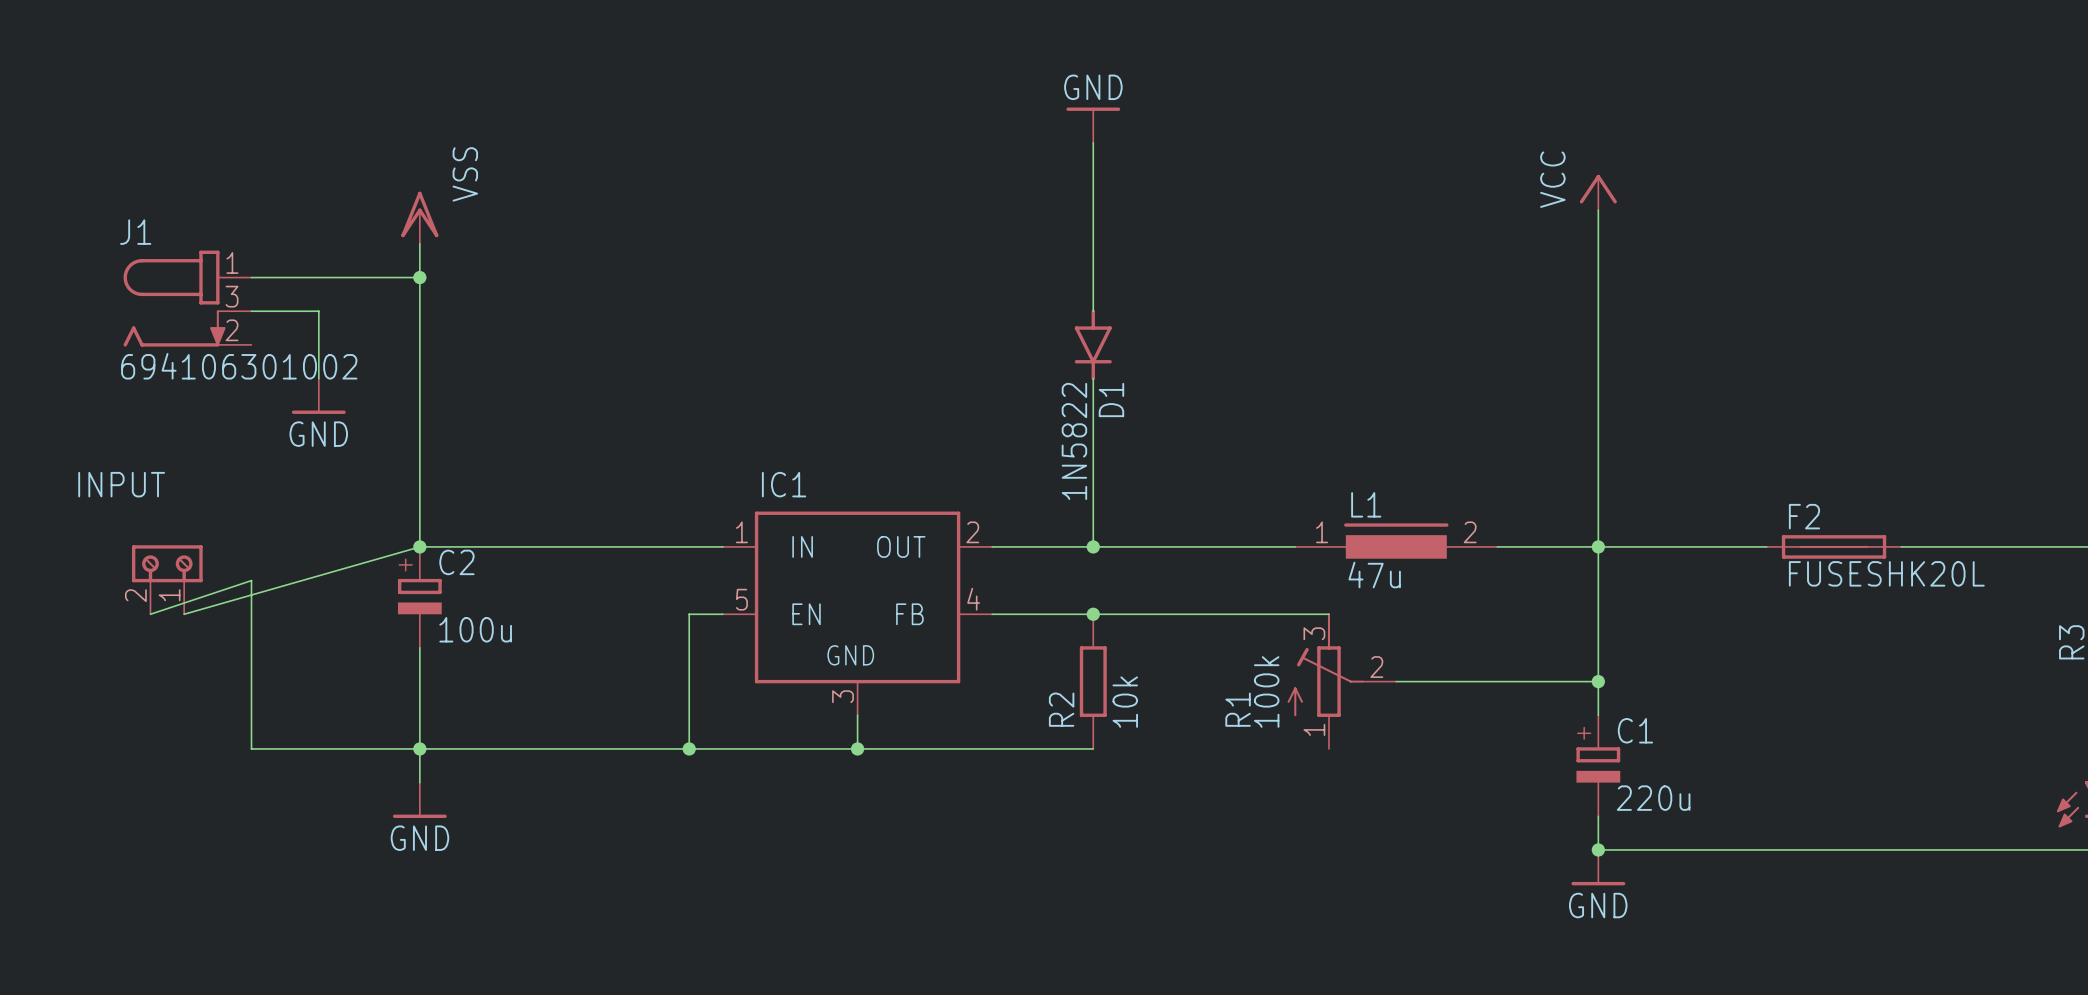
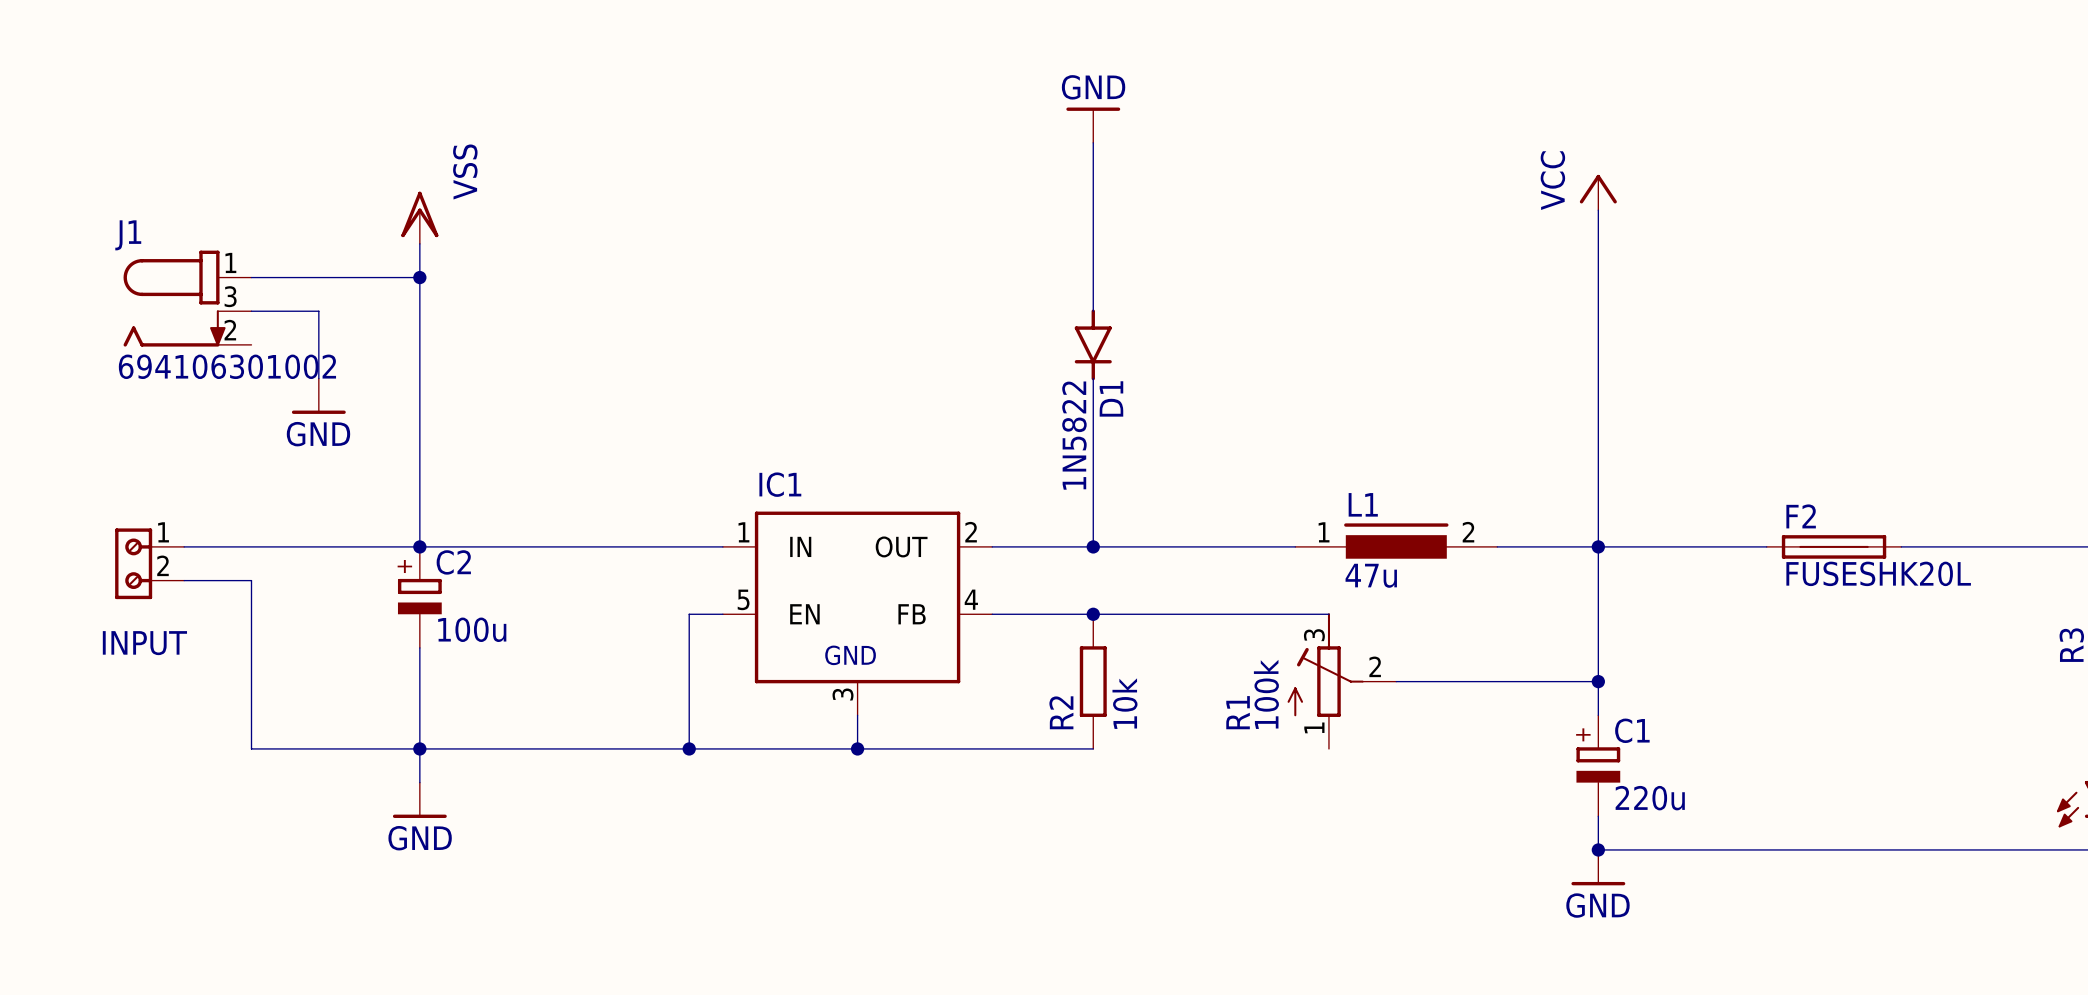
INPUT name position: INPUT (121, 484) -> INPUT (144, 643)
wire: (419, 546) (184, 614) -> (419, 546) (184, 546)
INPUT rotation: 0° (167, 563) -> 90° counterclockwise (133, 563)
wire: (251, 580) (150, 614) -> (251, 580) (184, 580)

